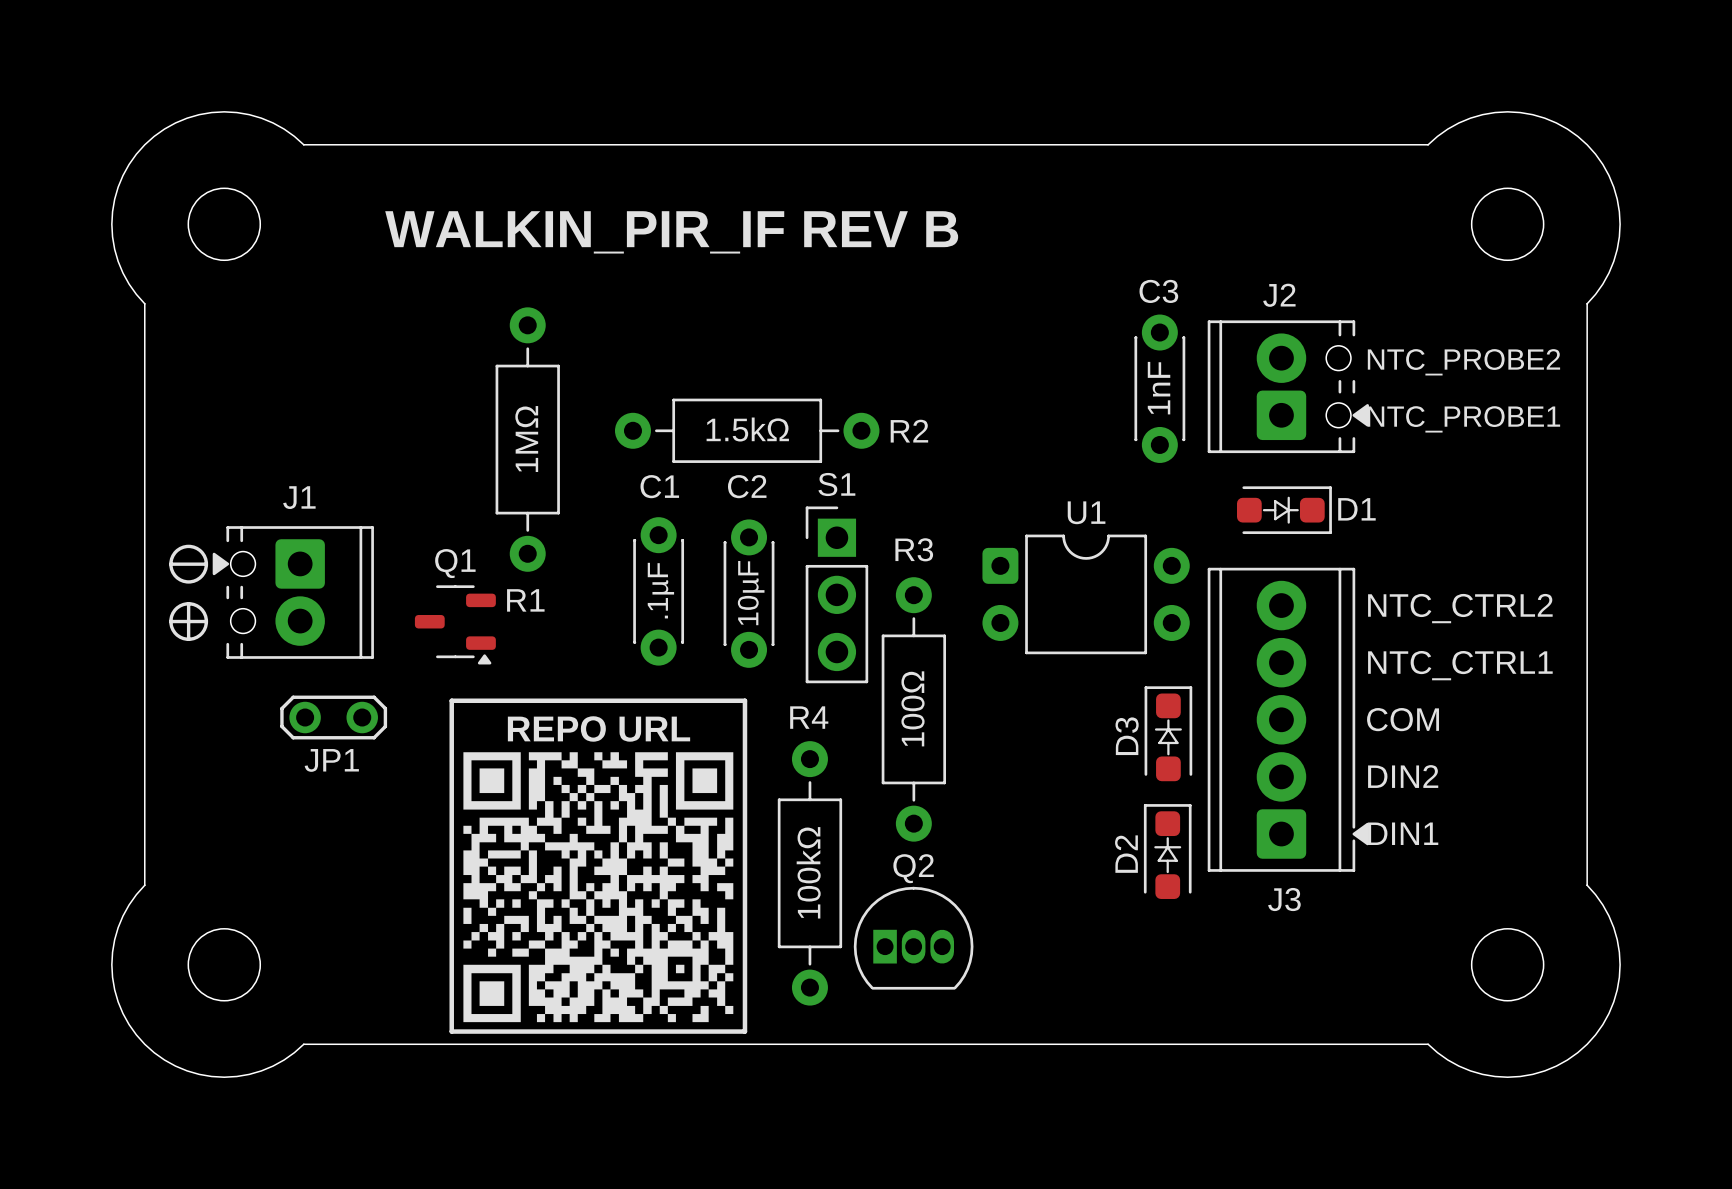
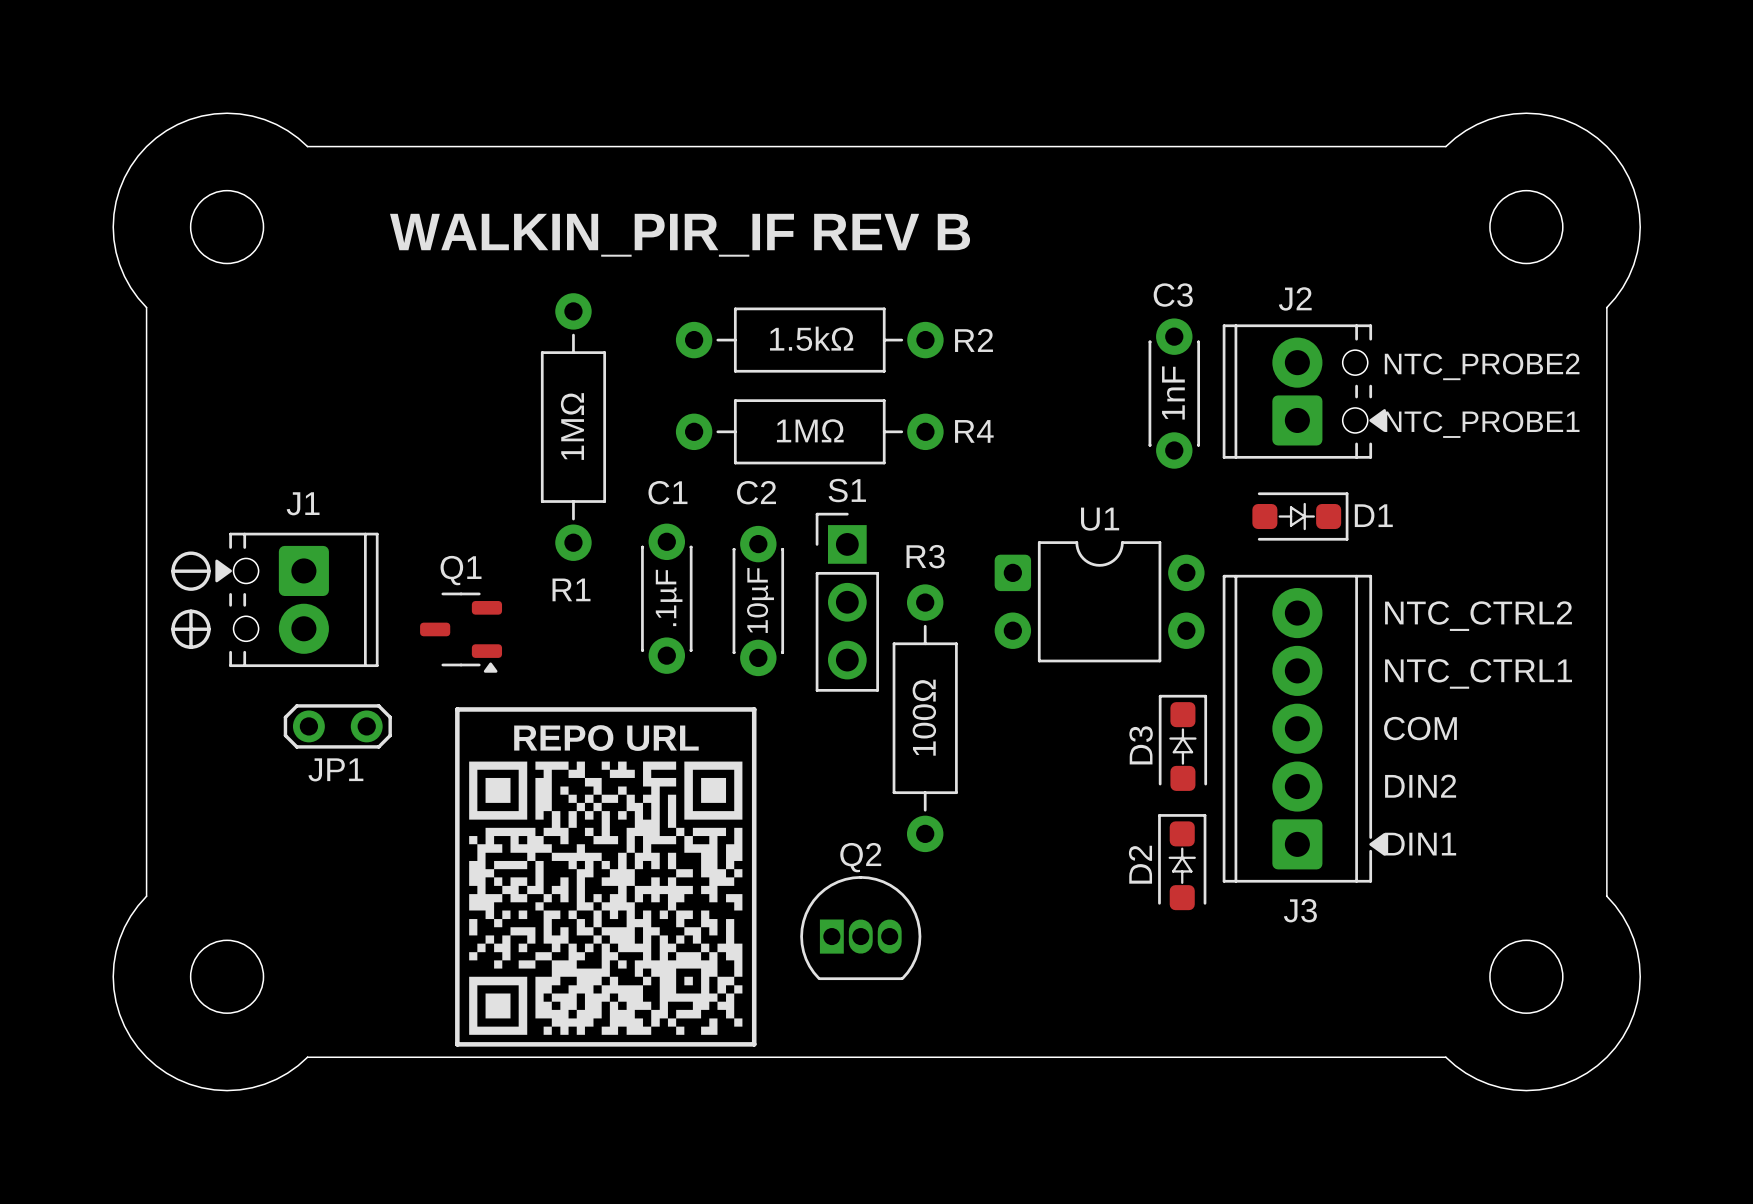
text: none -> 1MΩ (810, 430)
text position: 1.5kΩ (747, 429) -> 1.5kΩ (811, 338)
R2 position: (747, 430) -> (809, 340)
text position: 1MΩ (526, 439) -> 1MΩ (572, 426)
R1 position: (527, 439) -> (573, 427)
text: 100kΩ (808, 872) -> none
R4 rotation: 0° (809, 873) -> 90° clockwise (809, 431)
R4 position: (809, 873) -> (809, 431)
Q2 position: (913, 938) -> (860, 928)

